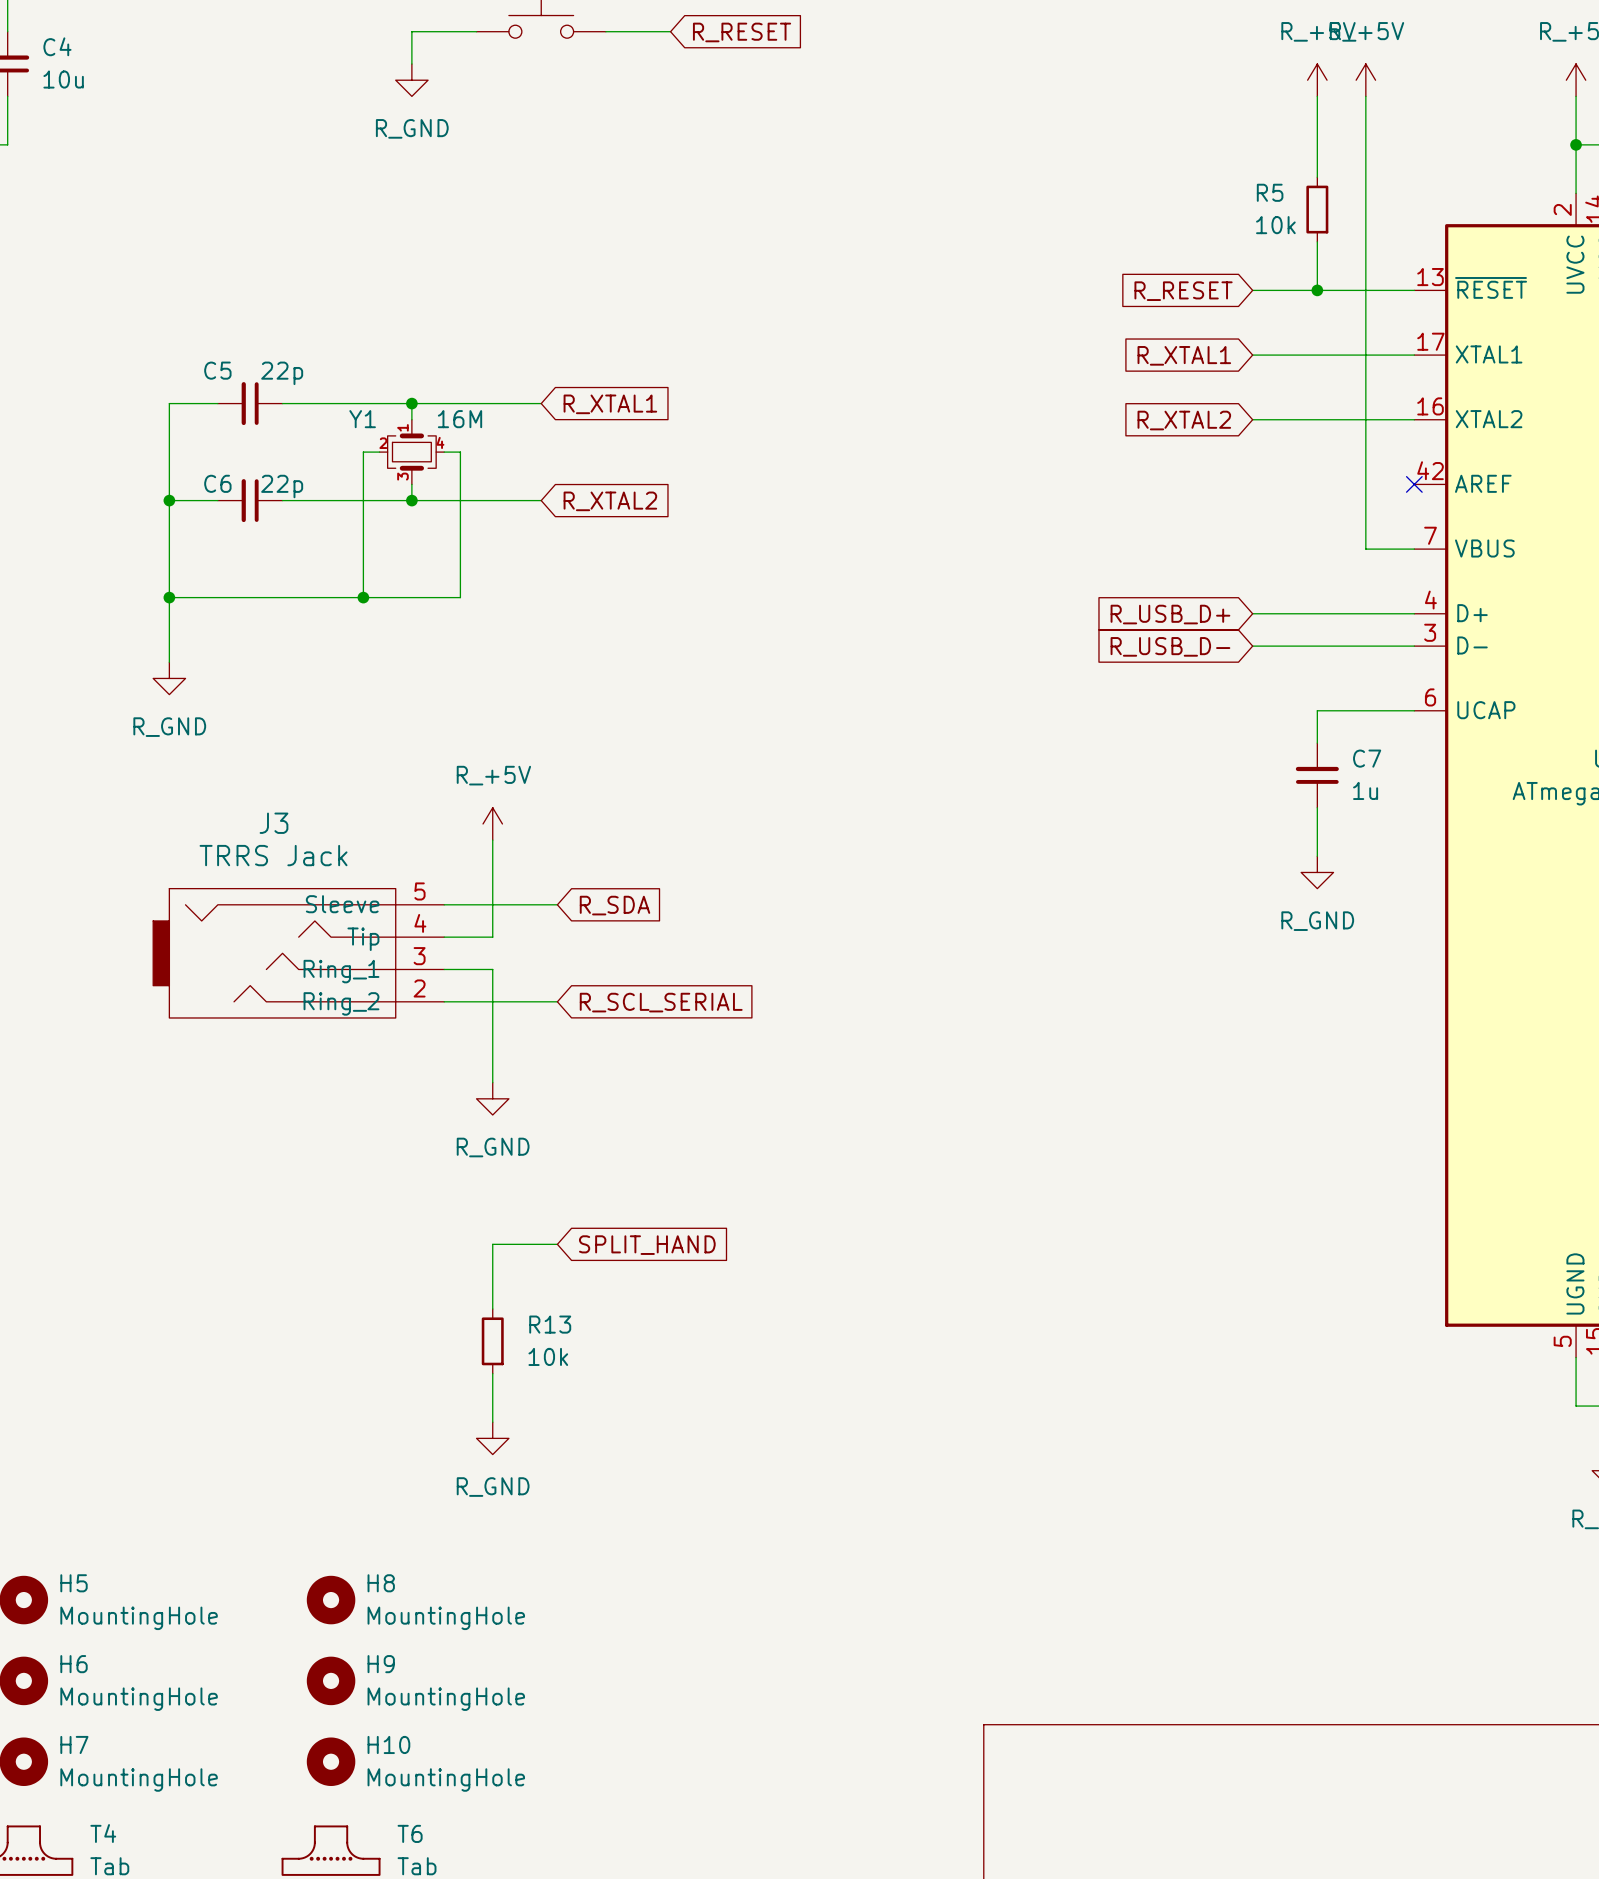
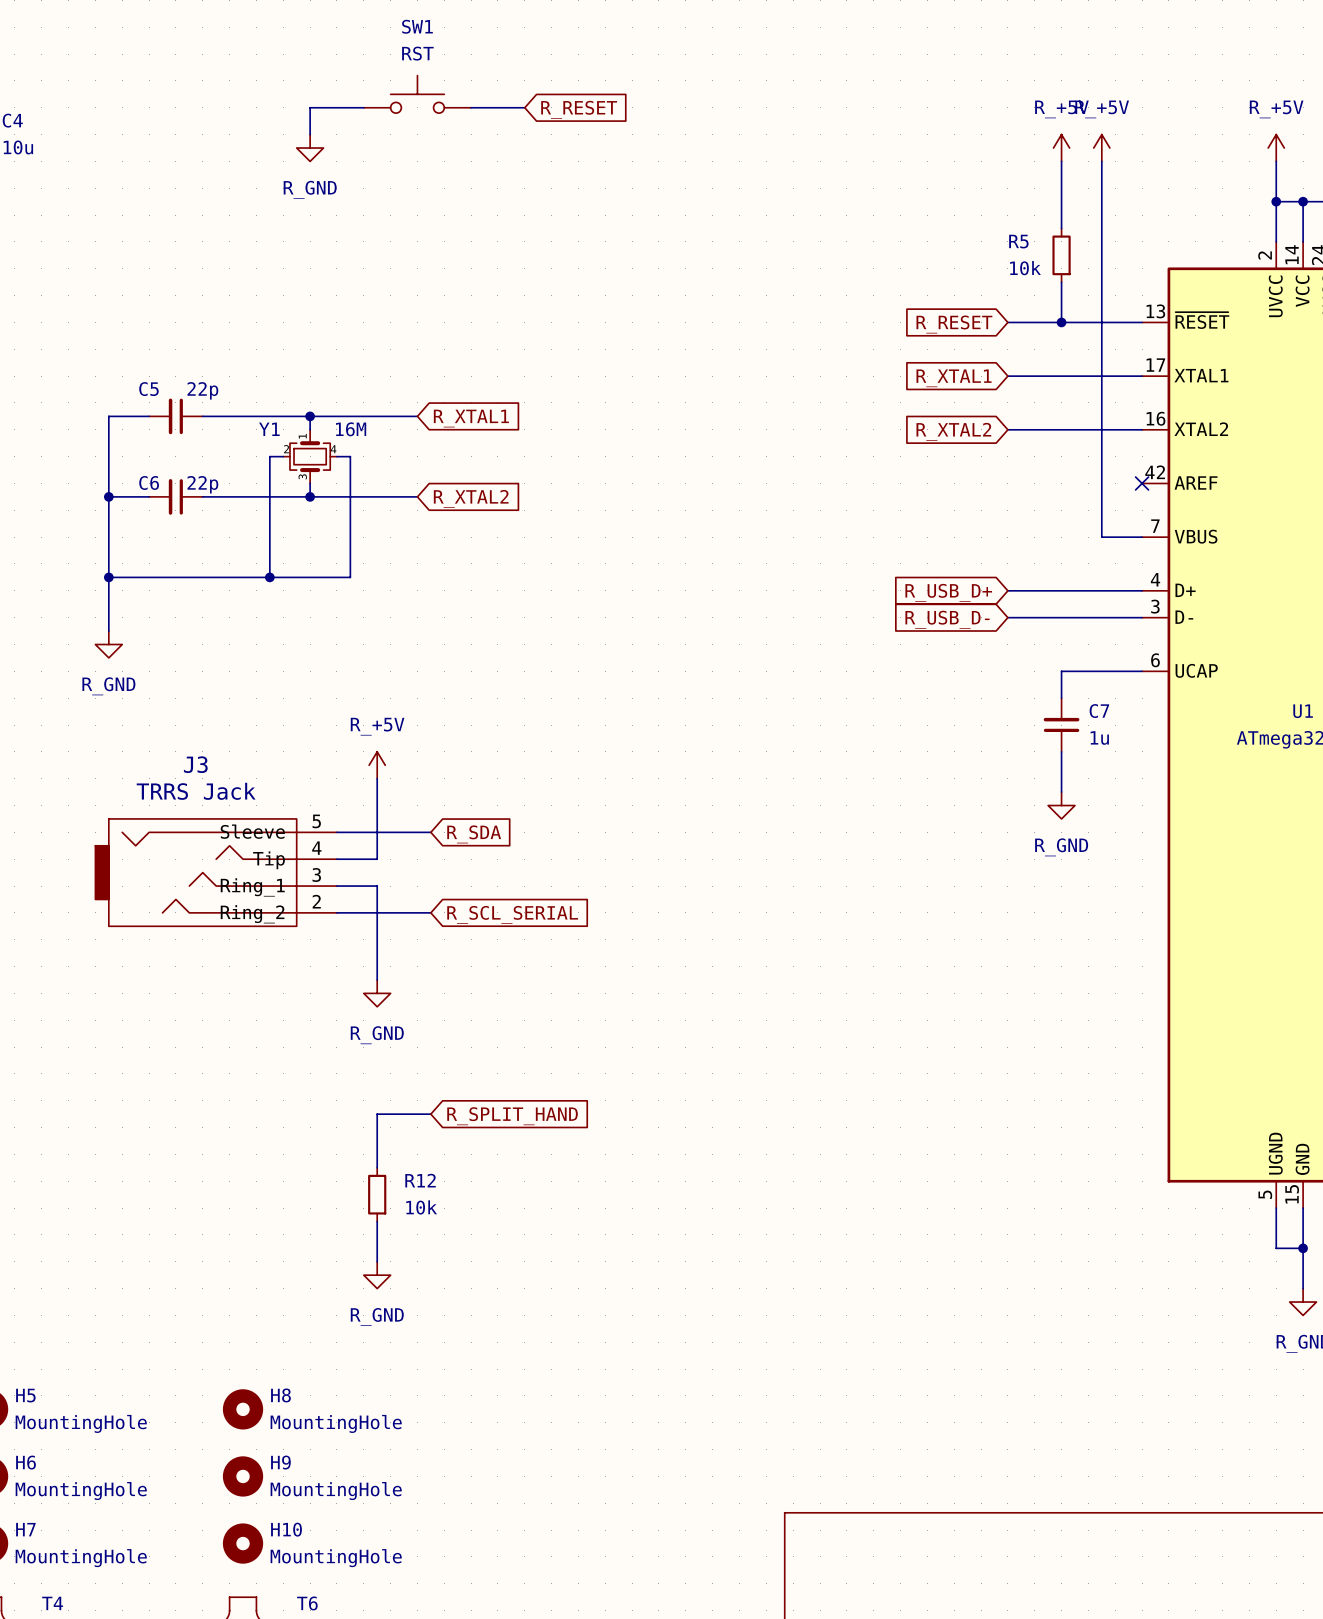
global label: SPLIT_HAND (647, 1245) -> R_SPLIT_HAND (512, 1116)
R13 name: R13 (550, 1324) -> R12 (420, 1180)

